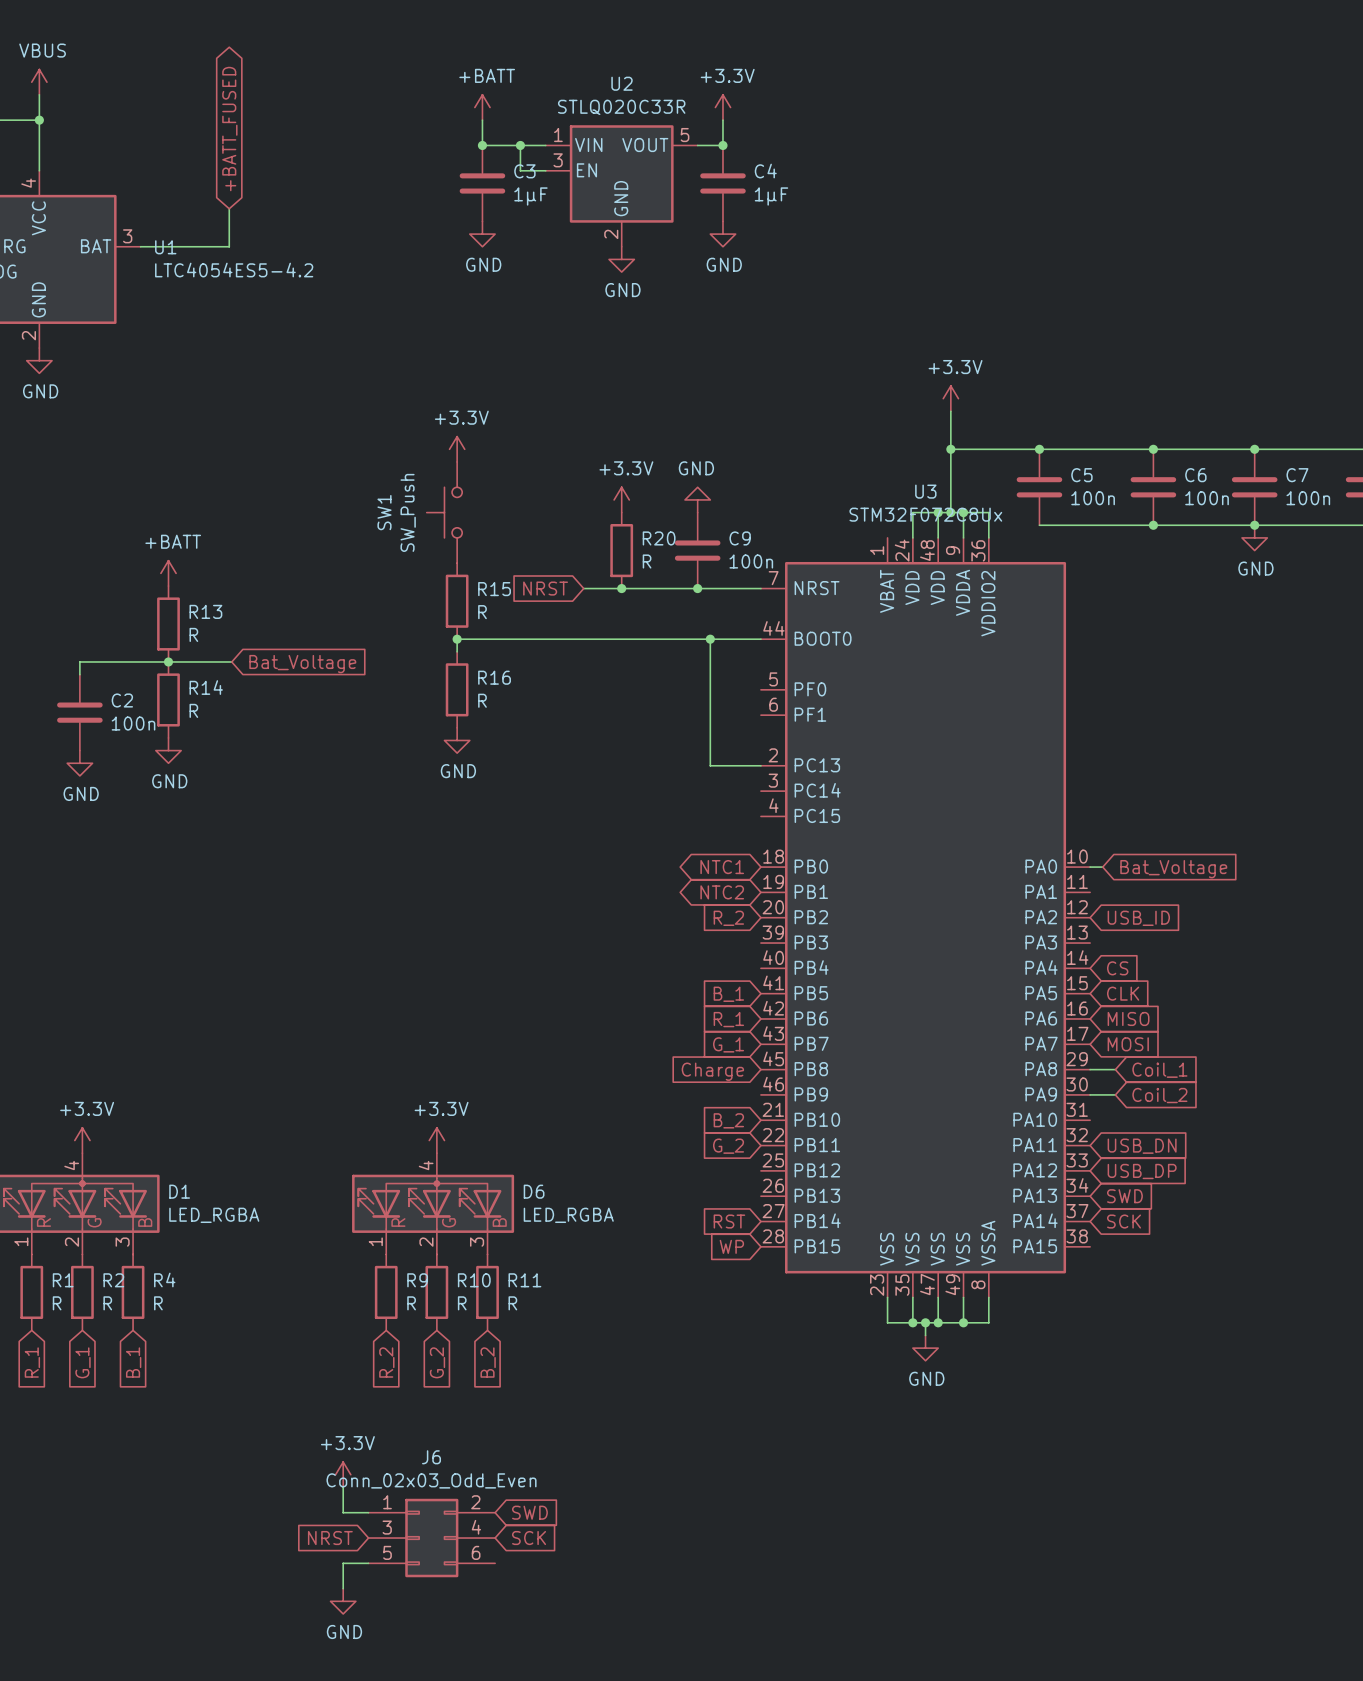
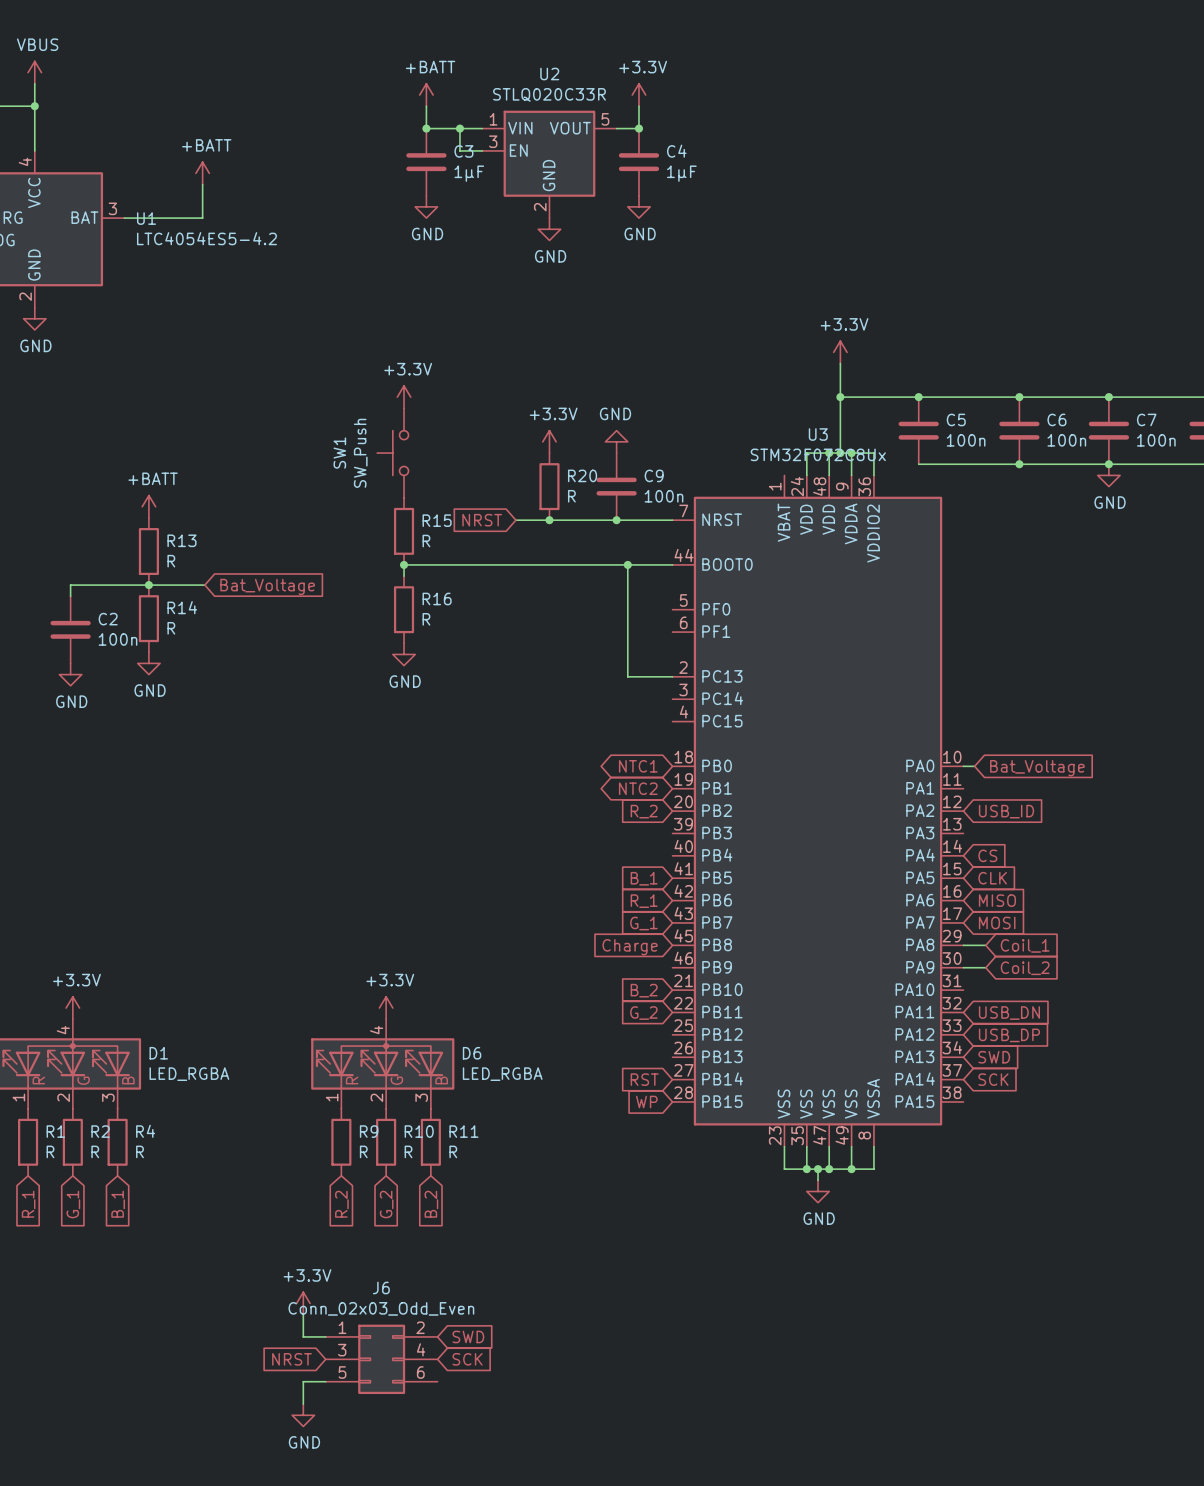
global label: +BATT_FUSED (229, 129) -> none
power symbol: none -> +BATT (202, 173)

